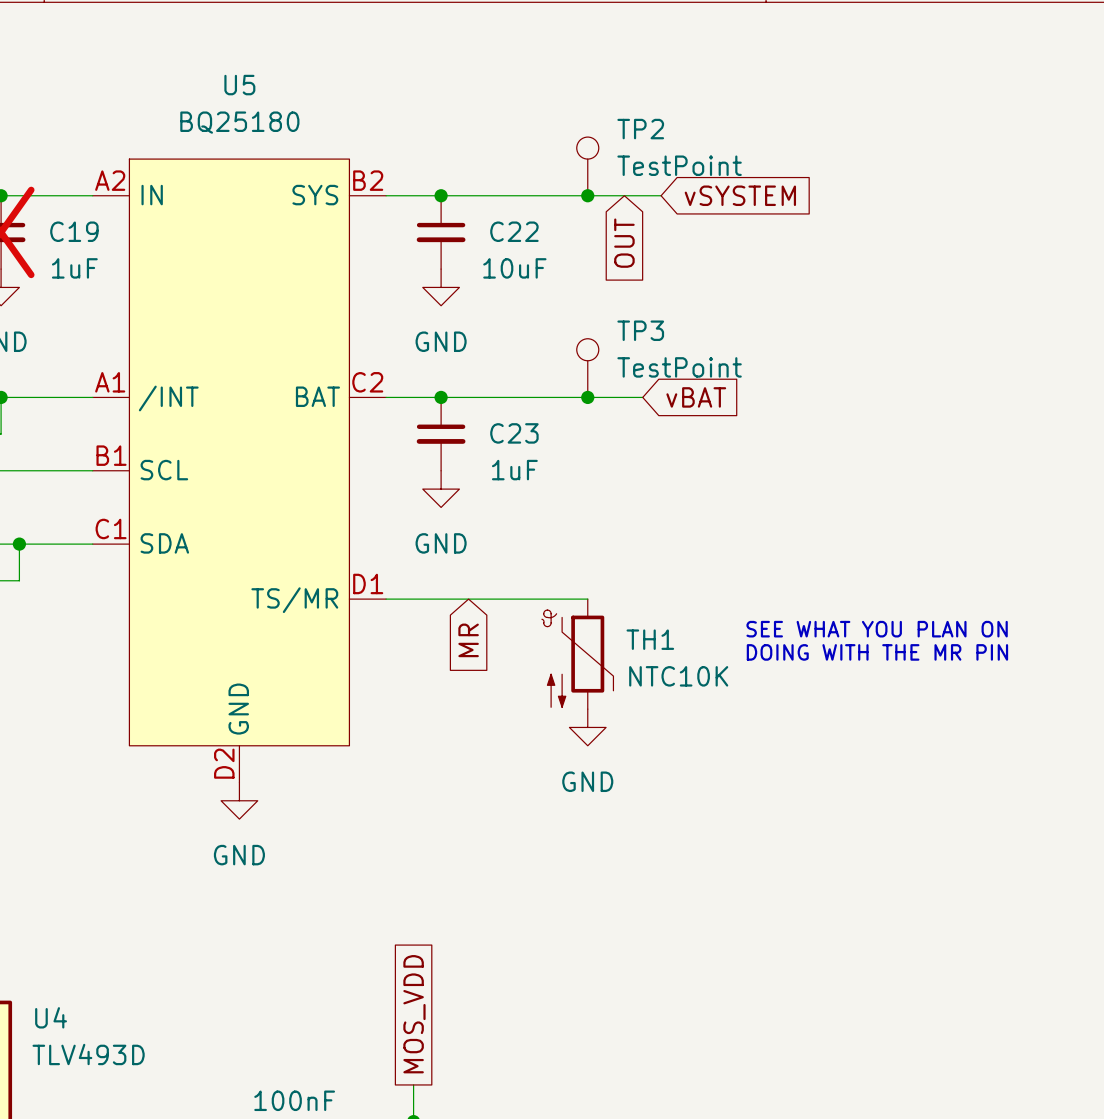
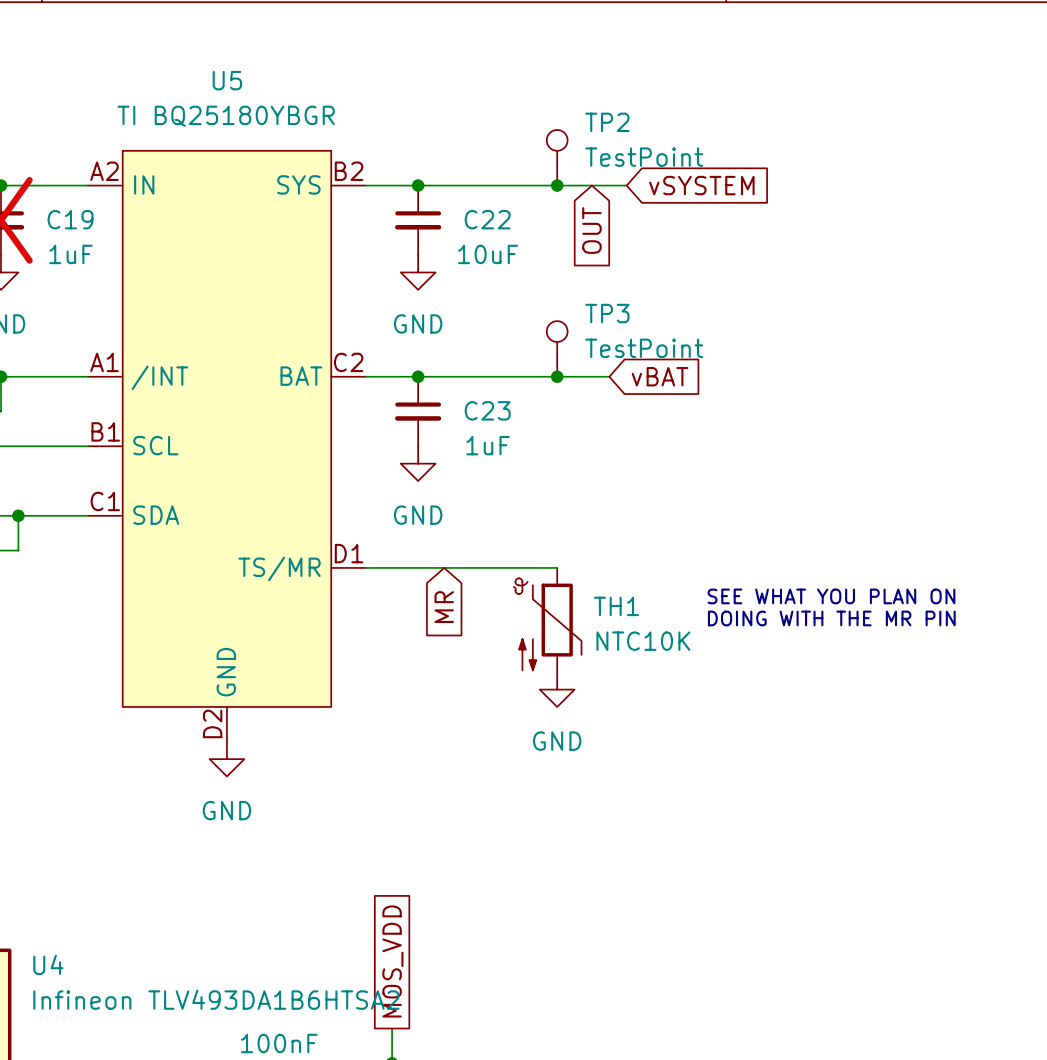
U5 value: BQ25180 (239, 122) -> TI BQ25180YBGR (226, 116)
U4 value: TLV493D (88, 1054) -> Infineon TLV493DA1B6HTSA2 (216, 999)

